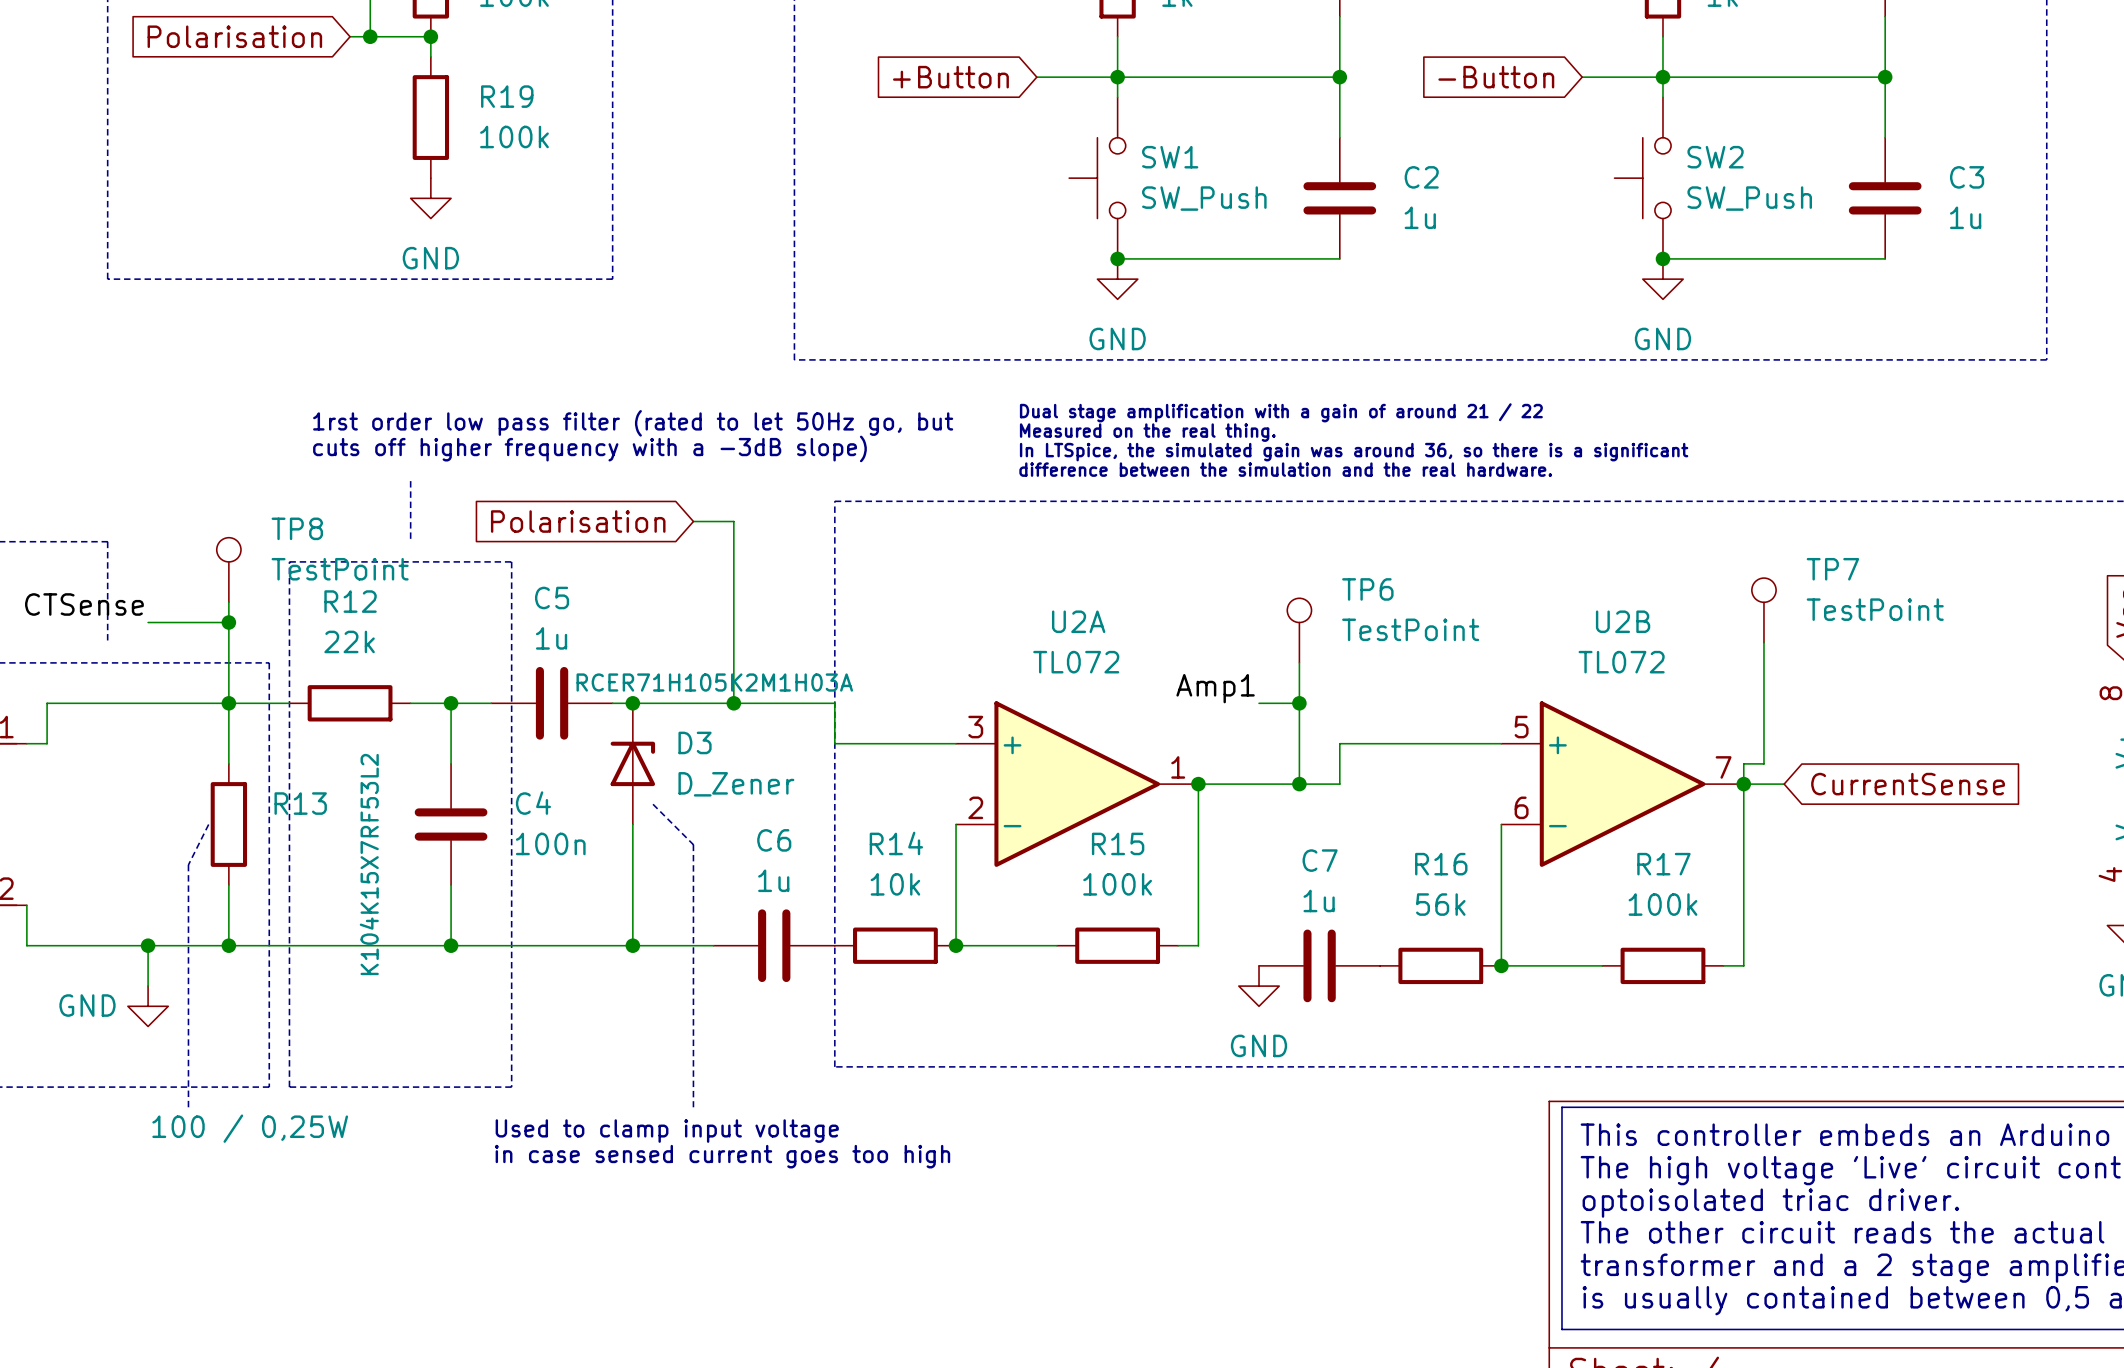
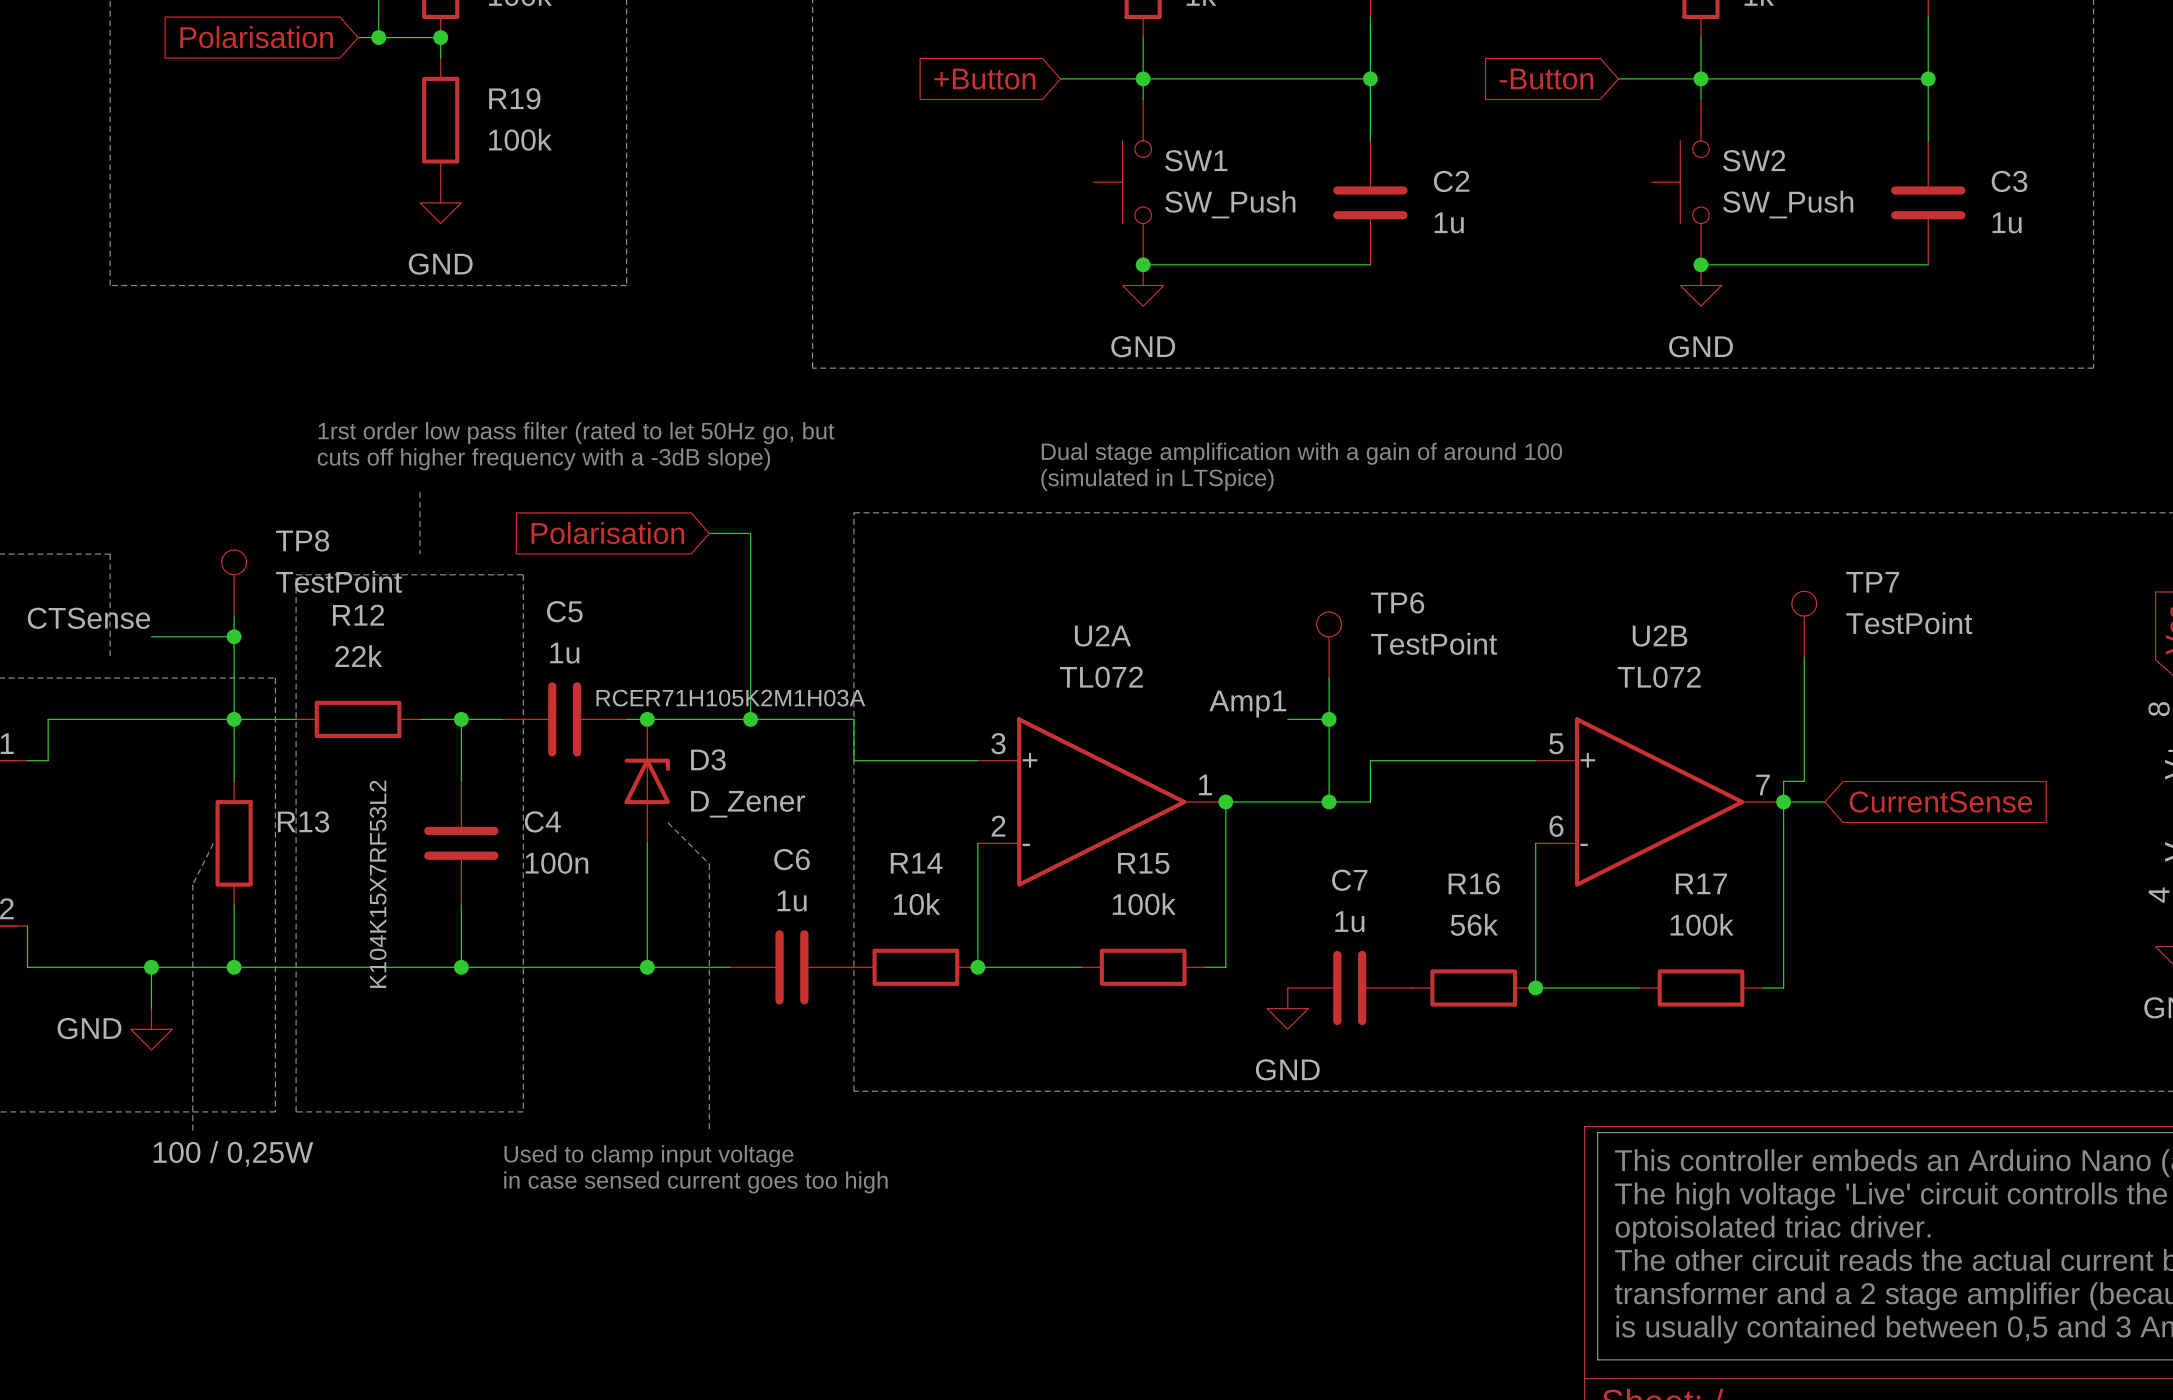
text: Dual stage amplification with a gain of around 21 / 22 (1281, 412) -> none
text: Measured on the real thing. (1147, 432) -> none
text: In LTSpice, the simulated gain was around 36, so there is a significant (1354, 452) -> Dual stage amplification with a gain of around 100 (1301, 453)
text: difference between the simulation and the real hardware. (1285, 469) -> (simulated in LTSpice) (1157, 479)

